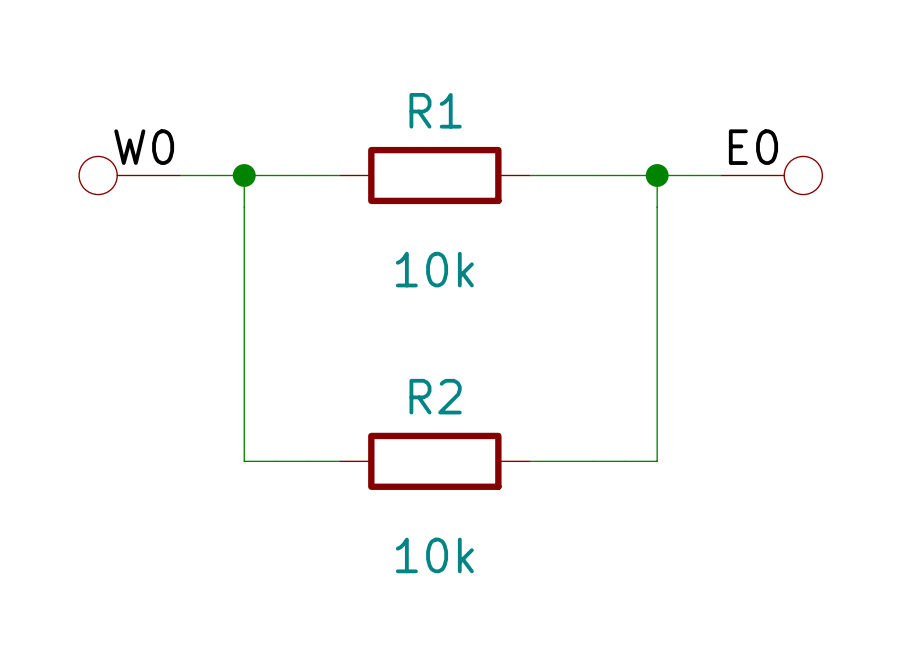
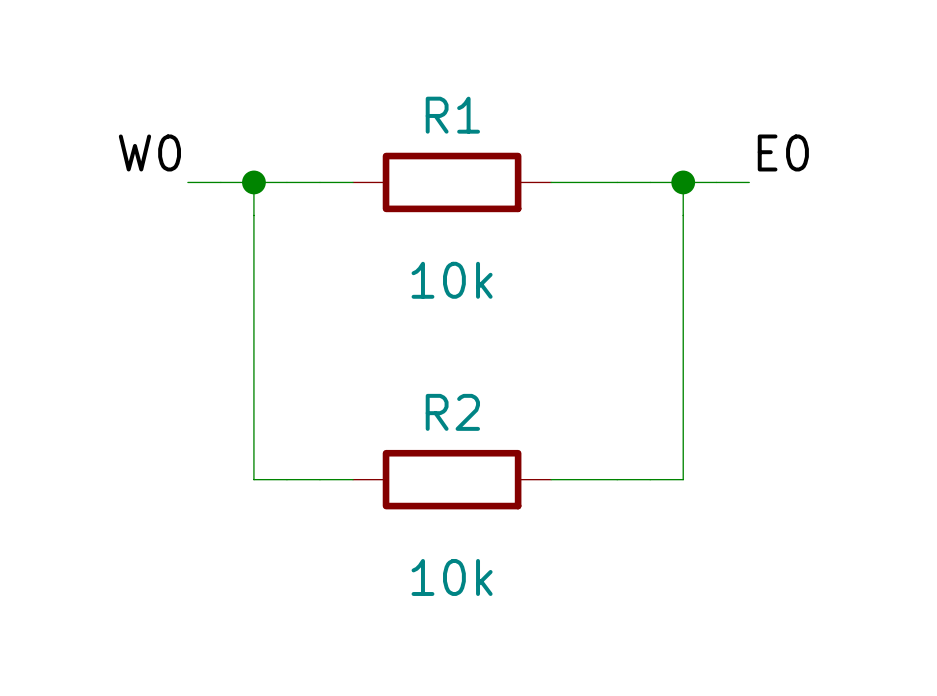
part: (129, 175) -> none
part: (771, 175) -> none

